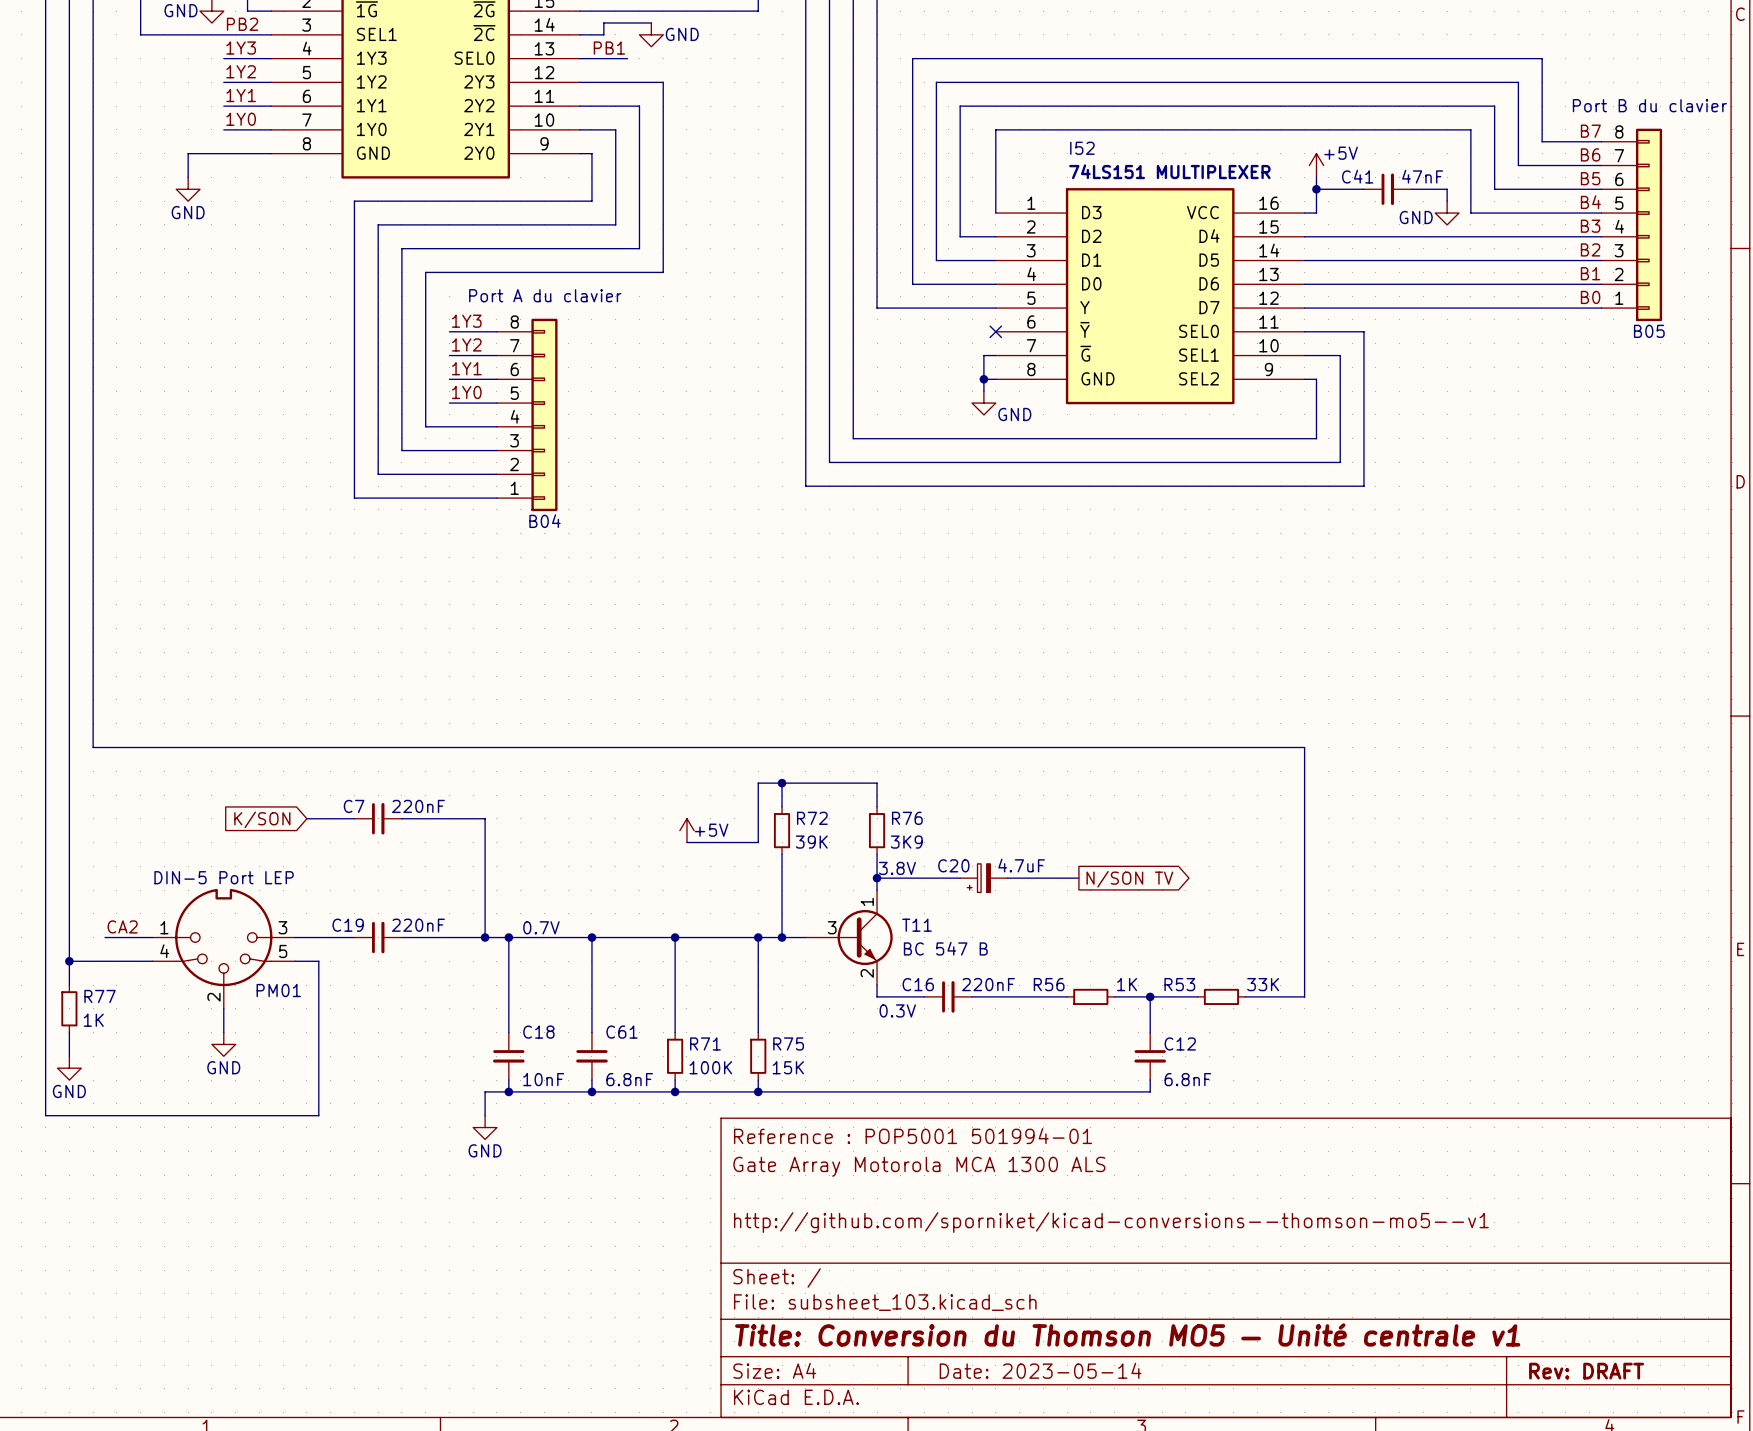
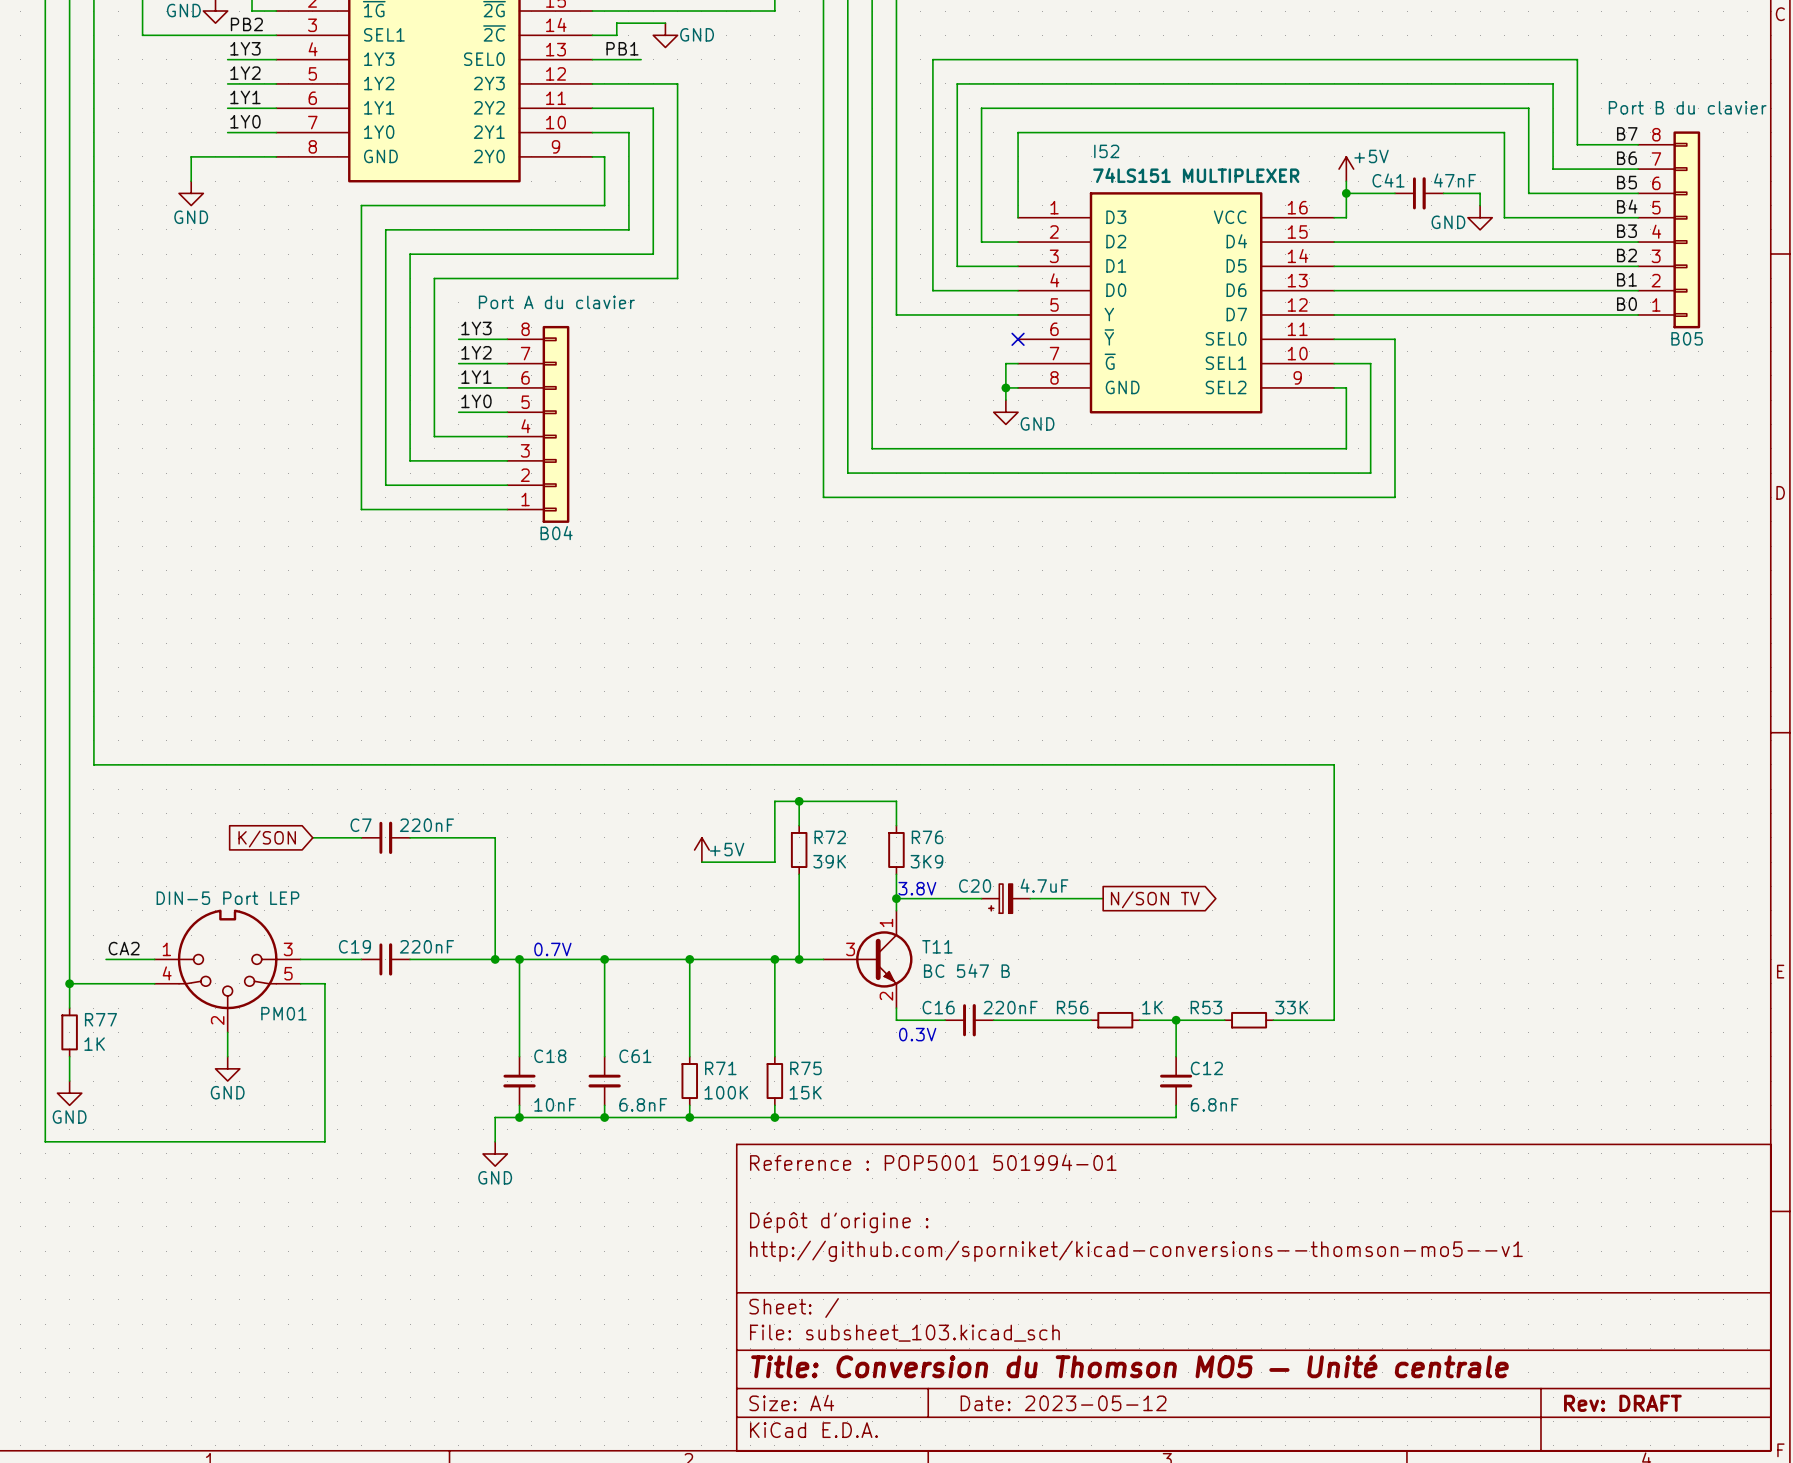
title block: Gate Array Motorola MCA 1300 ALS (919, 1166) -> none
title block: none -> Dépôt d'origine : (839, 1222)
title block: Title: Conversion du Thomson MO5 — Unité centrale v1 (1127, 1334) -> Title: Conversion du Thomson MO5 — Unité centrale (1129, 1366)
title block: Date: 2023-05-14 (1040, 1370) -> Date: 2023-05-12 (1063, 1403)

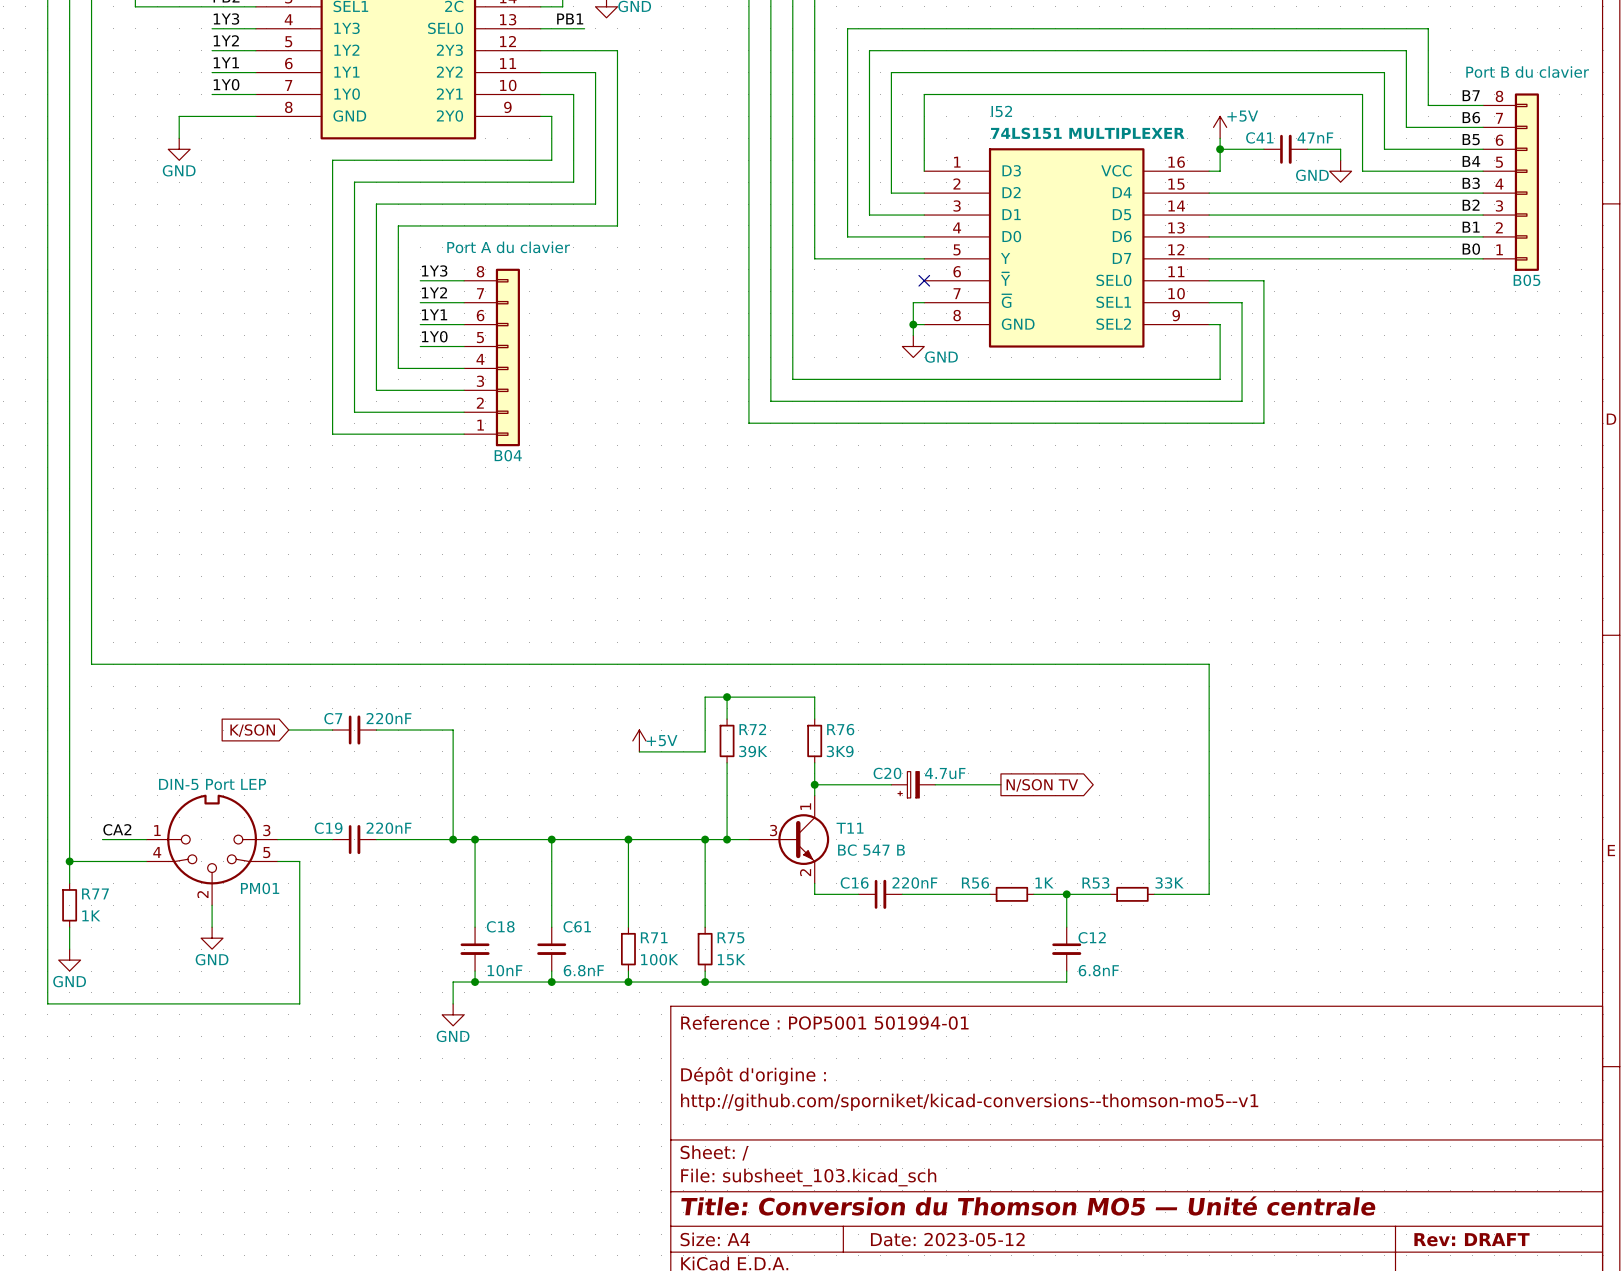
text: 3.8V (917, 888) -> none
text: 0.7V (552, 949) -> none
text: 0.3V (917, 1034) -> none

